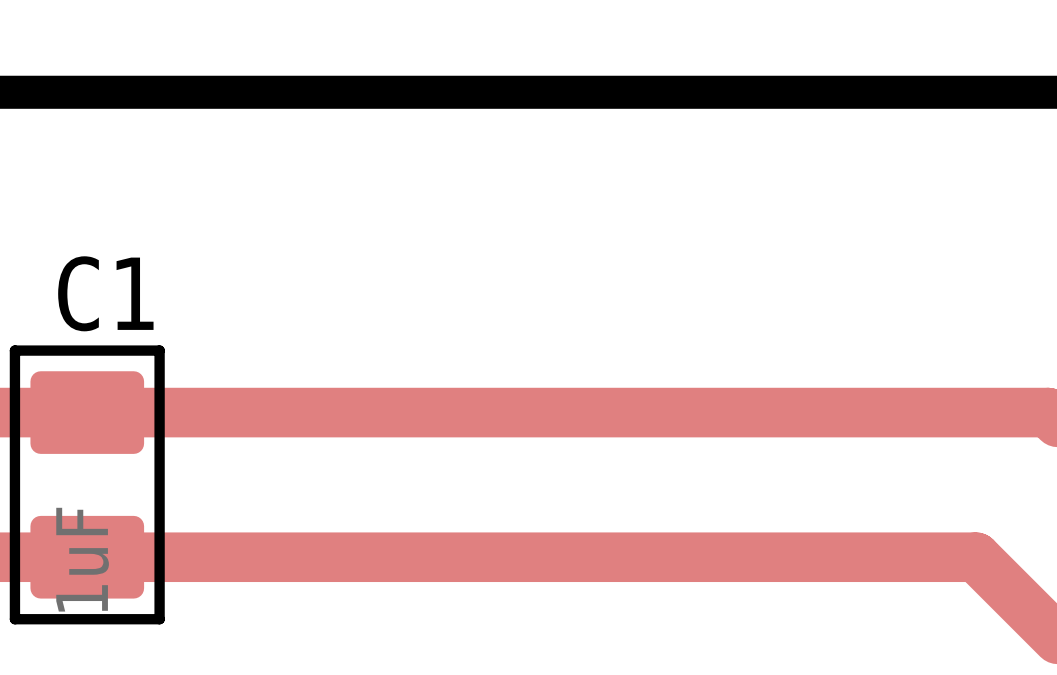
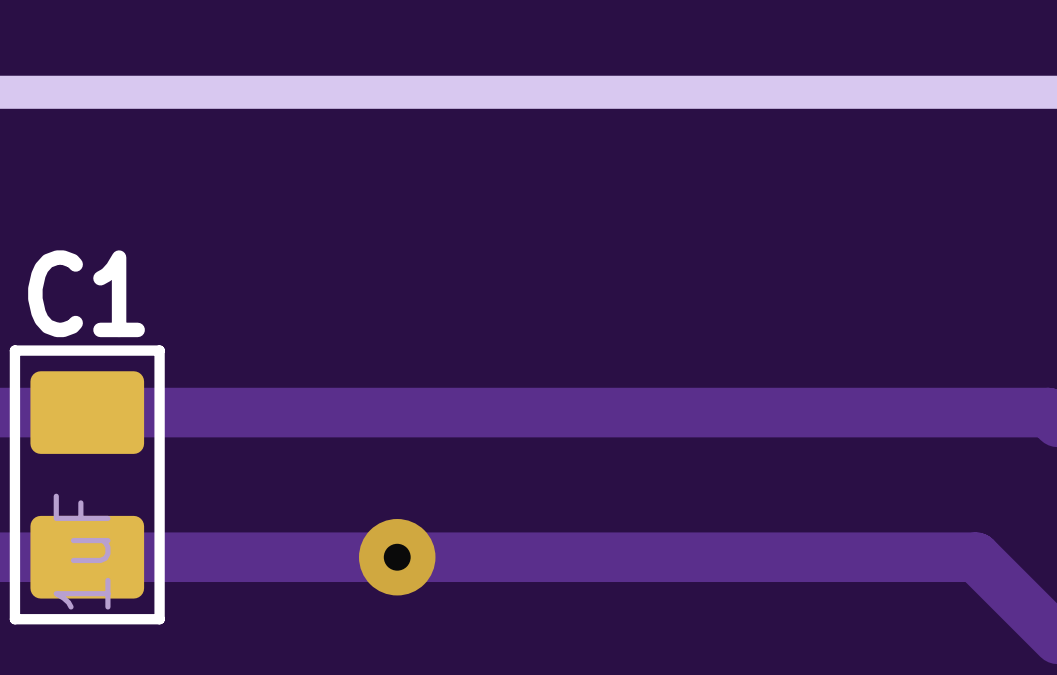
via: none -> (397, 557)

